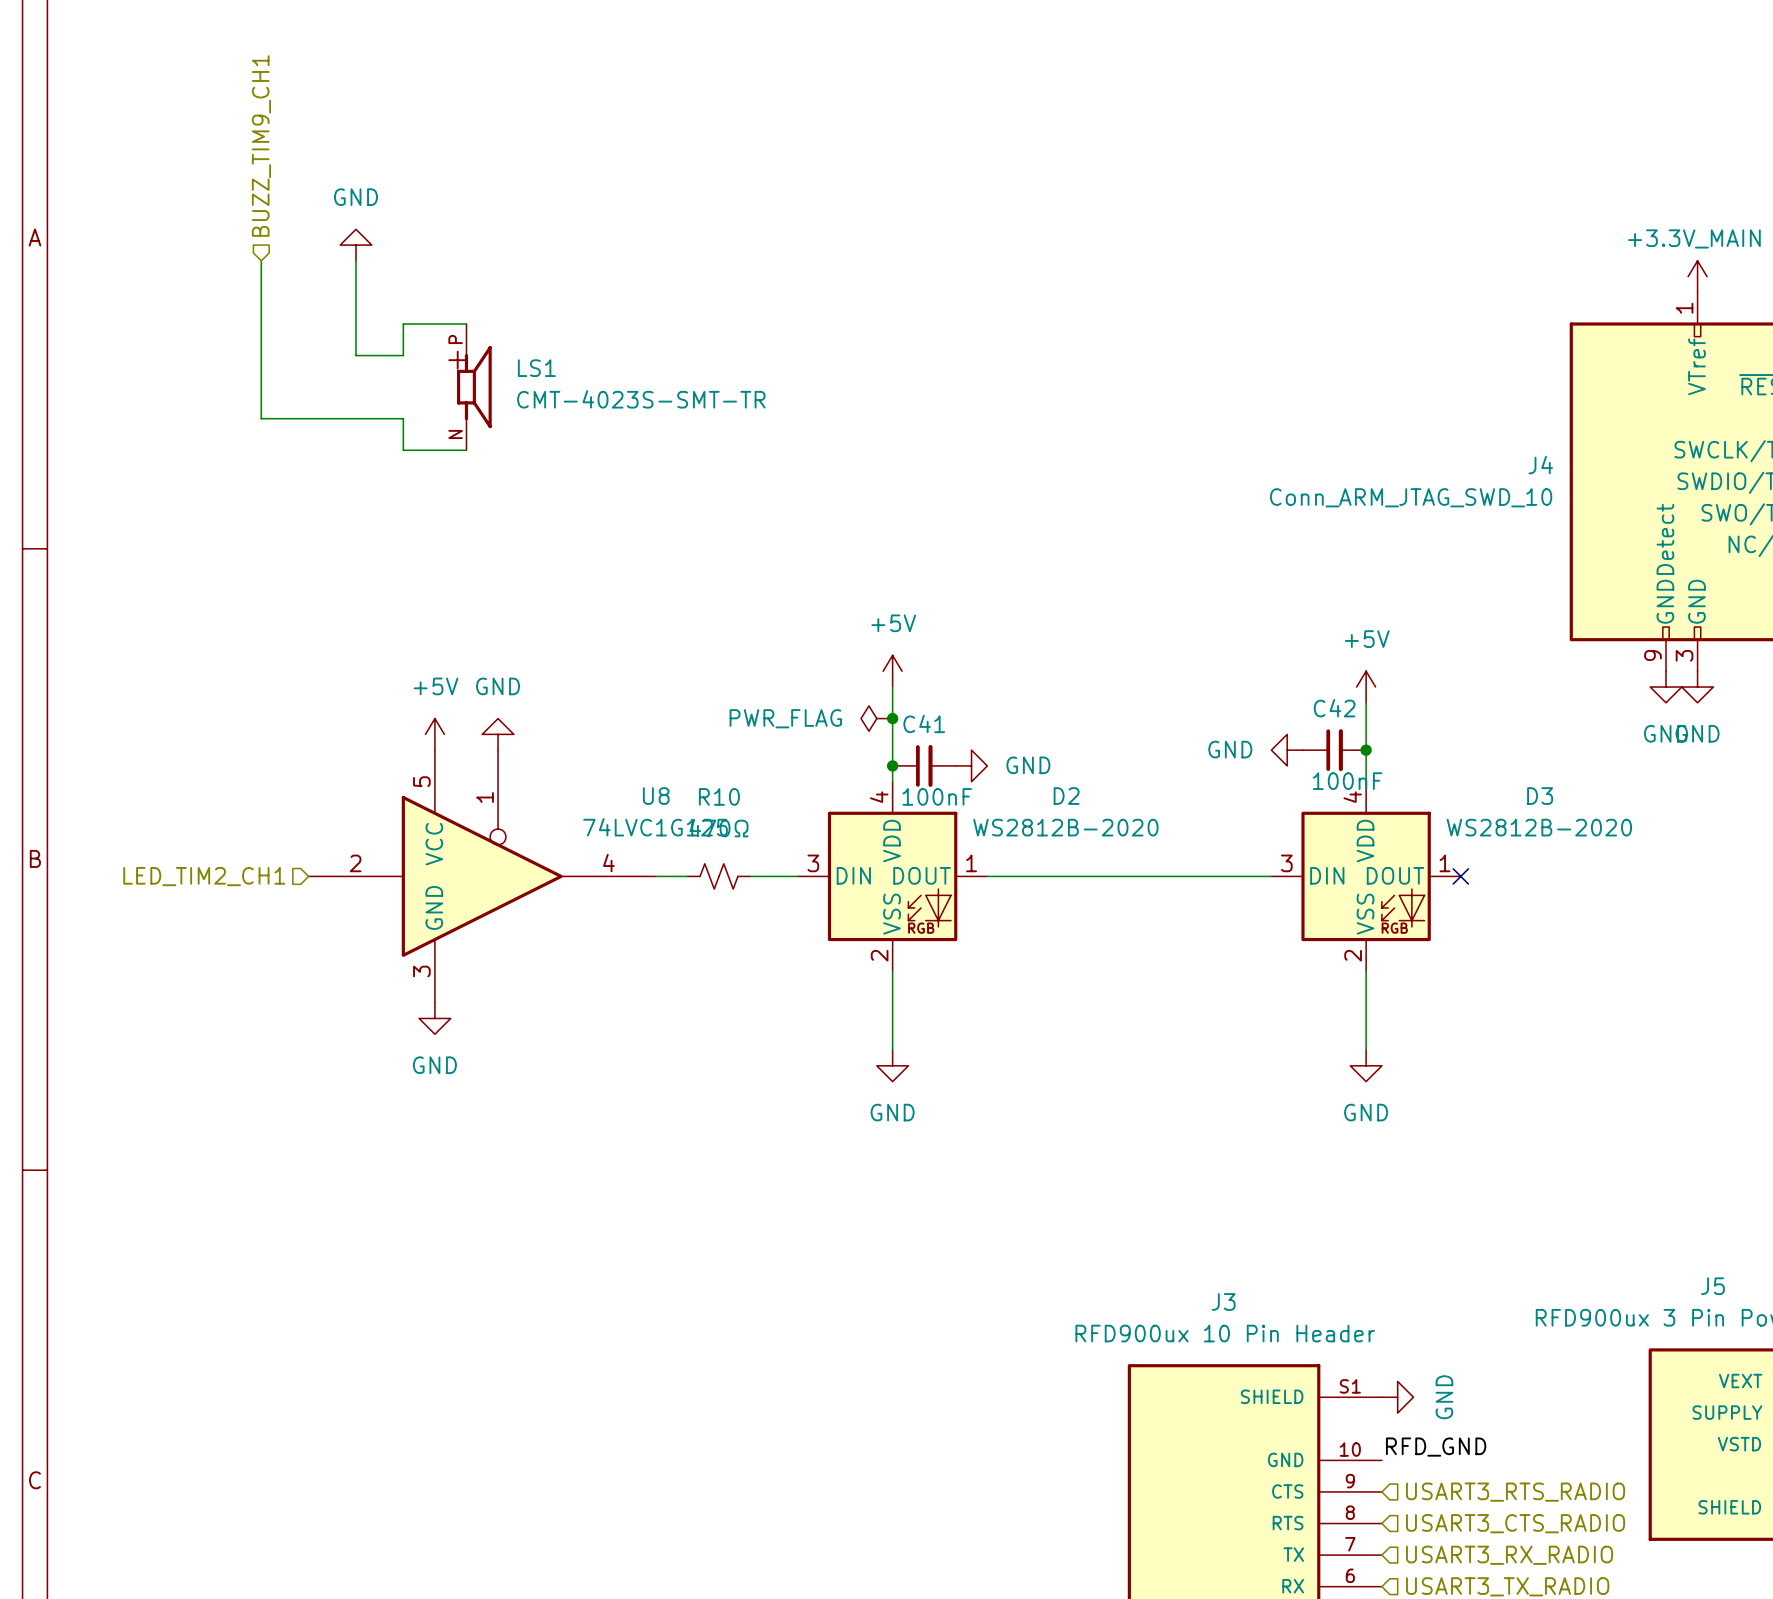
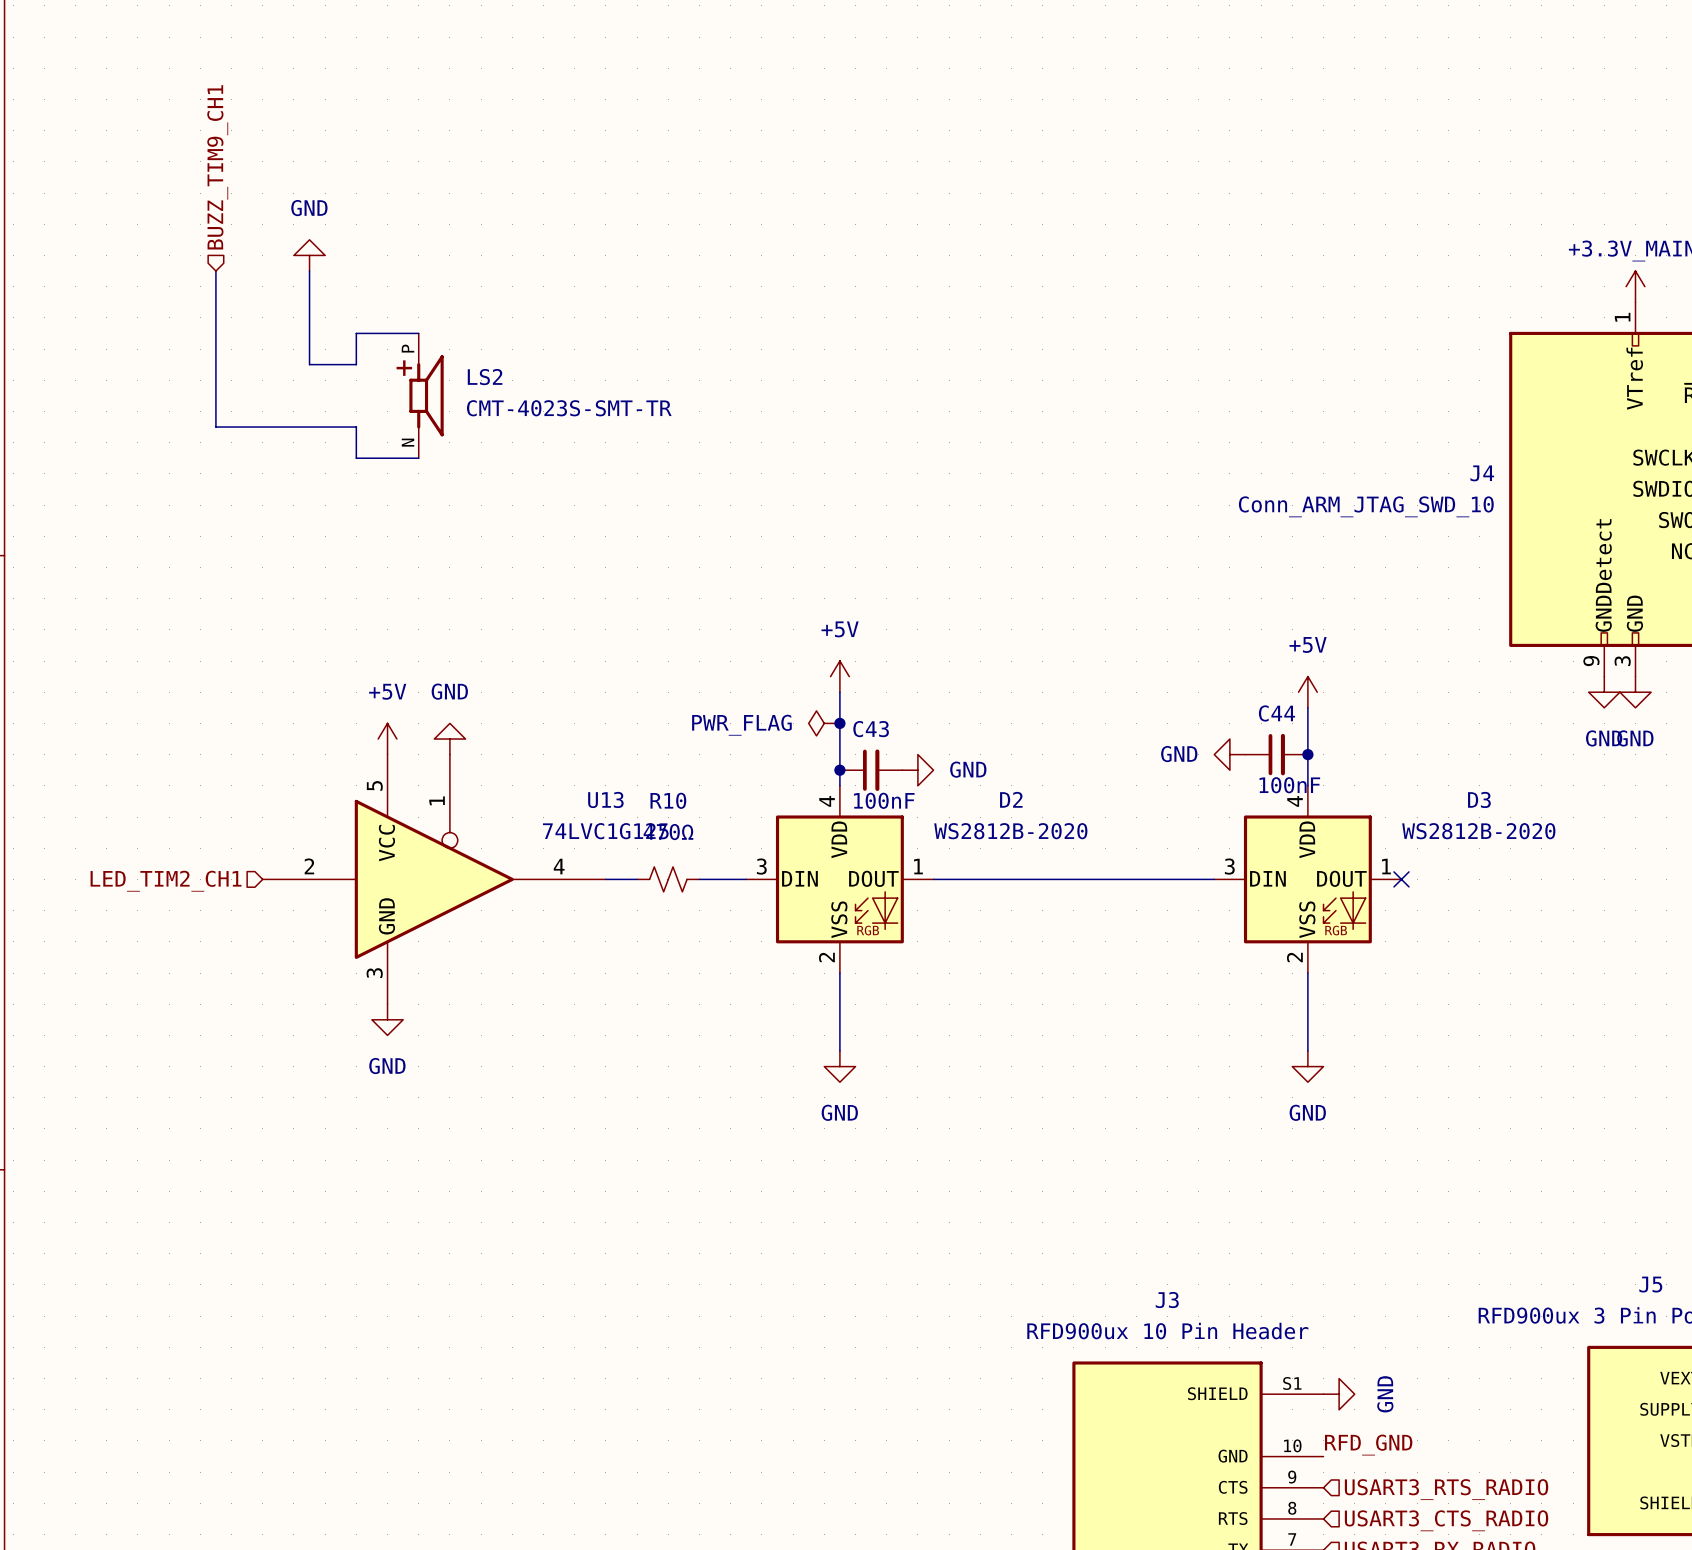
LS1 name: LS1 (536, 368) -> LS2 (485, 377)
C42 name: C42 (1334, 708) -> C44 (1276, 713)
C41 name: C41 (924, 723) -> C43 (871, 729)
U8 name: U8 (656, 796) -> U13 (605, 799)

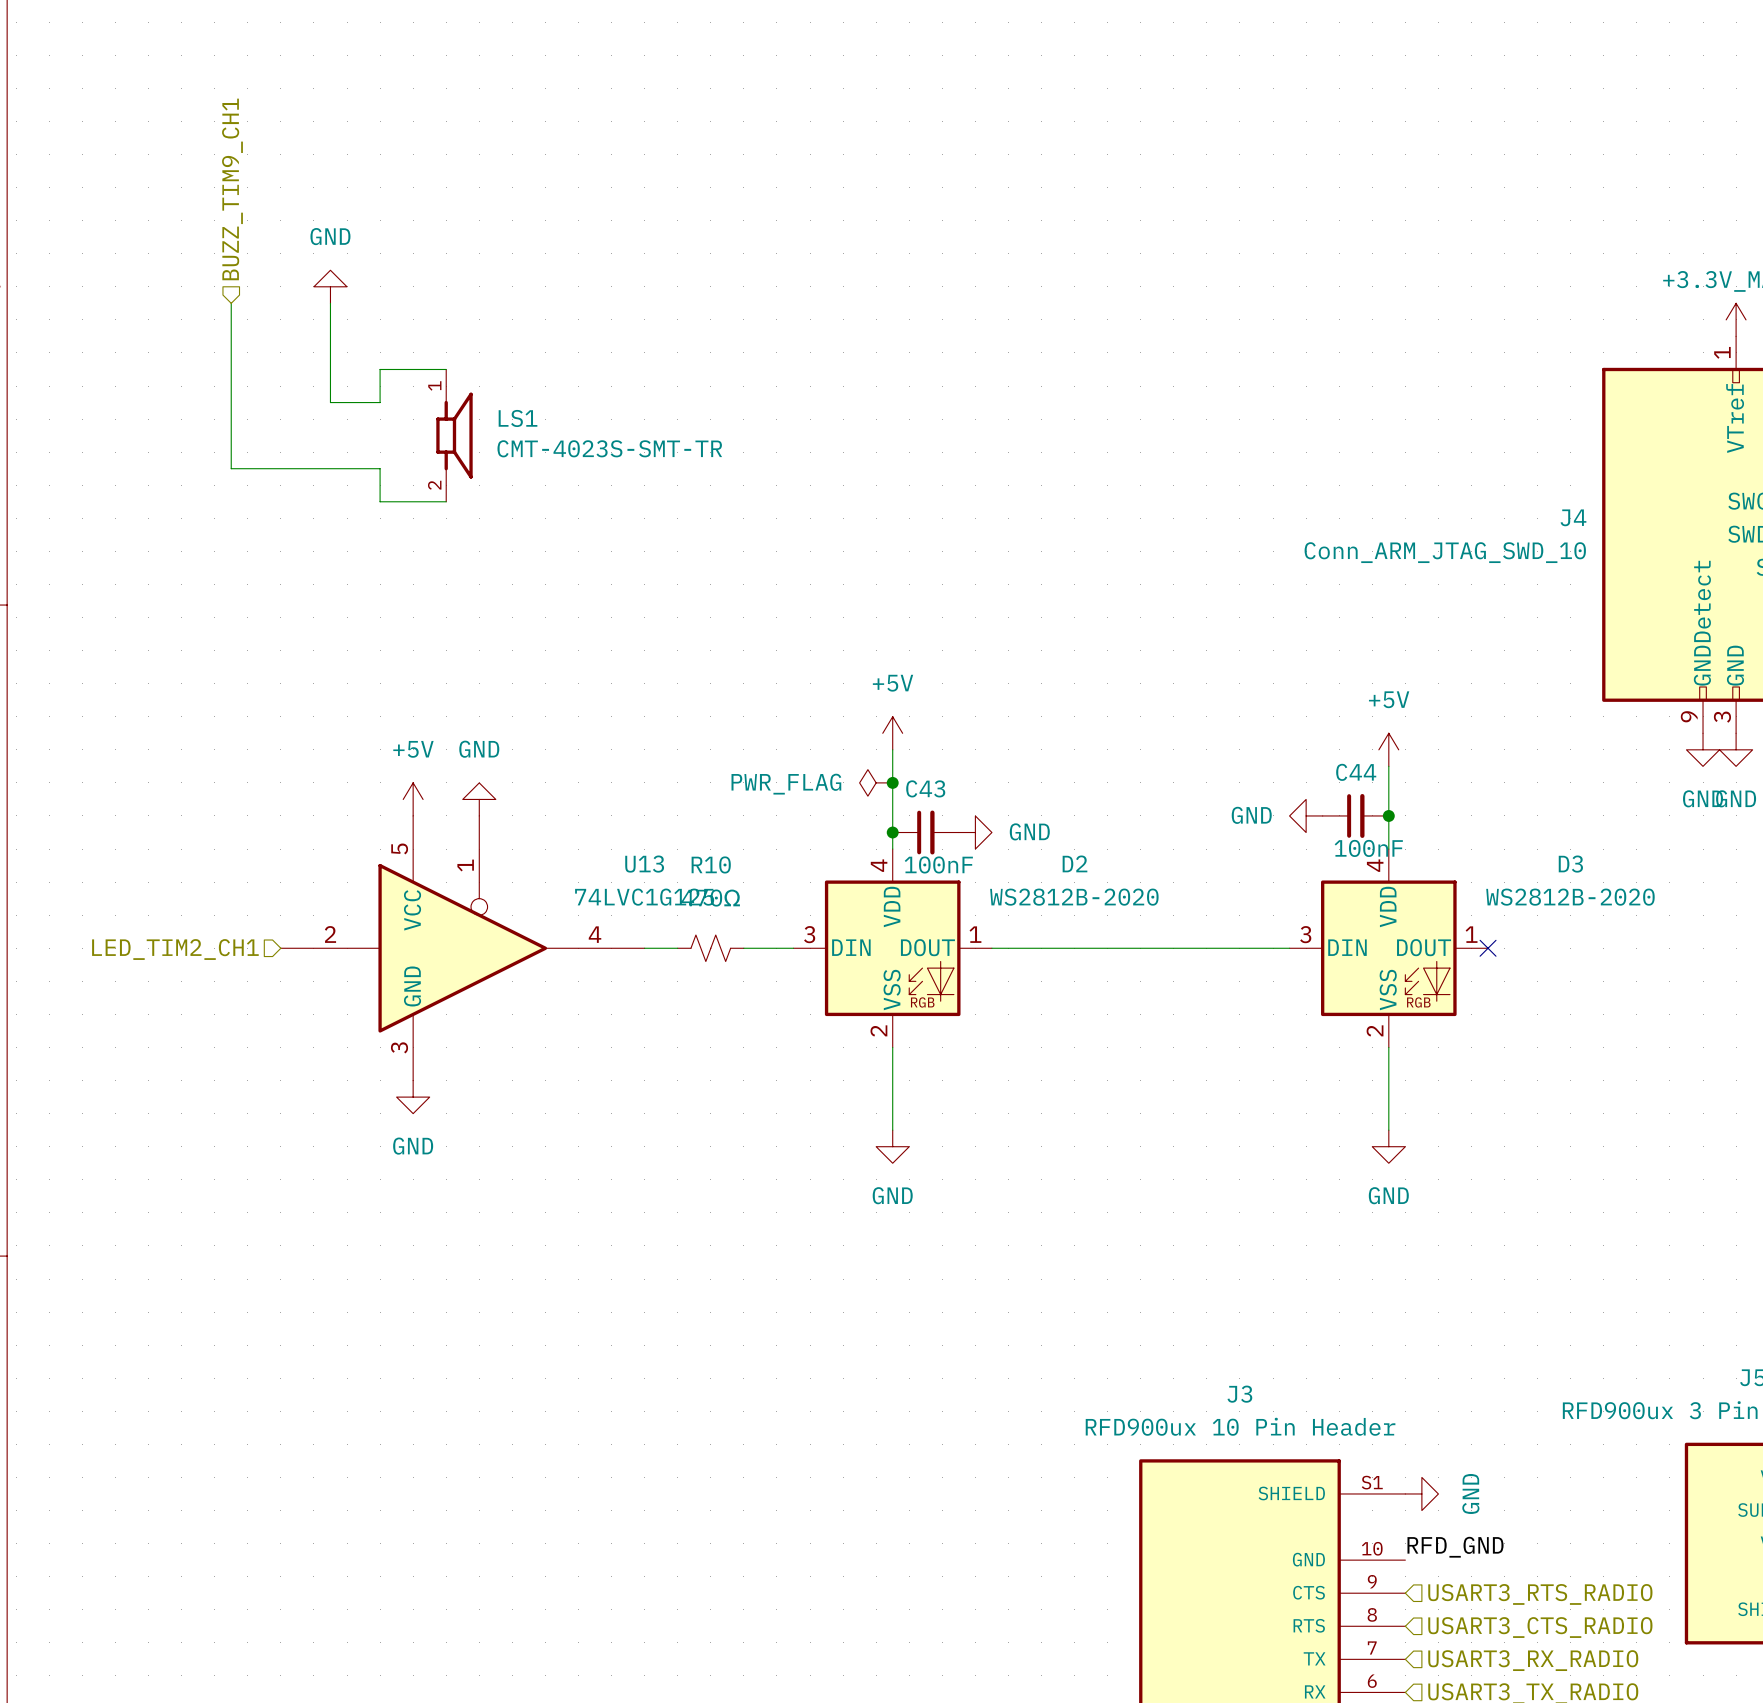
LS2 pin number: P (408, 348) -> 1 (434, 385)
LS2 text: + (404, 368) -> none
LS2 name: LS2 (485, 377) -> LS1 (518, 418)
LS2 pin number: N (408, 442) -> 2 (434, 485)

